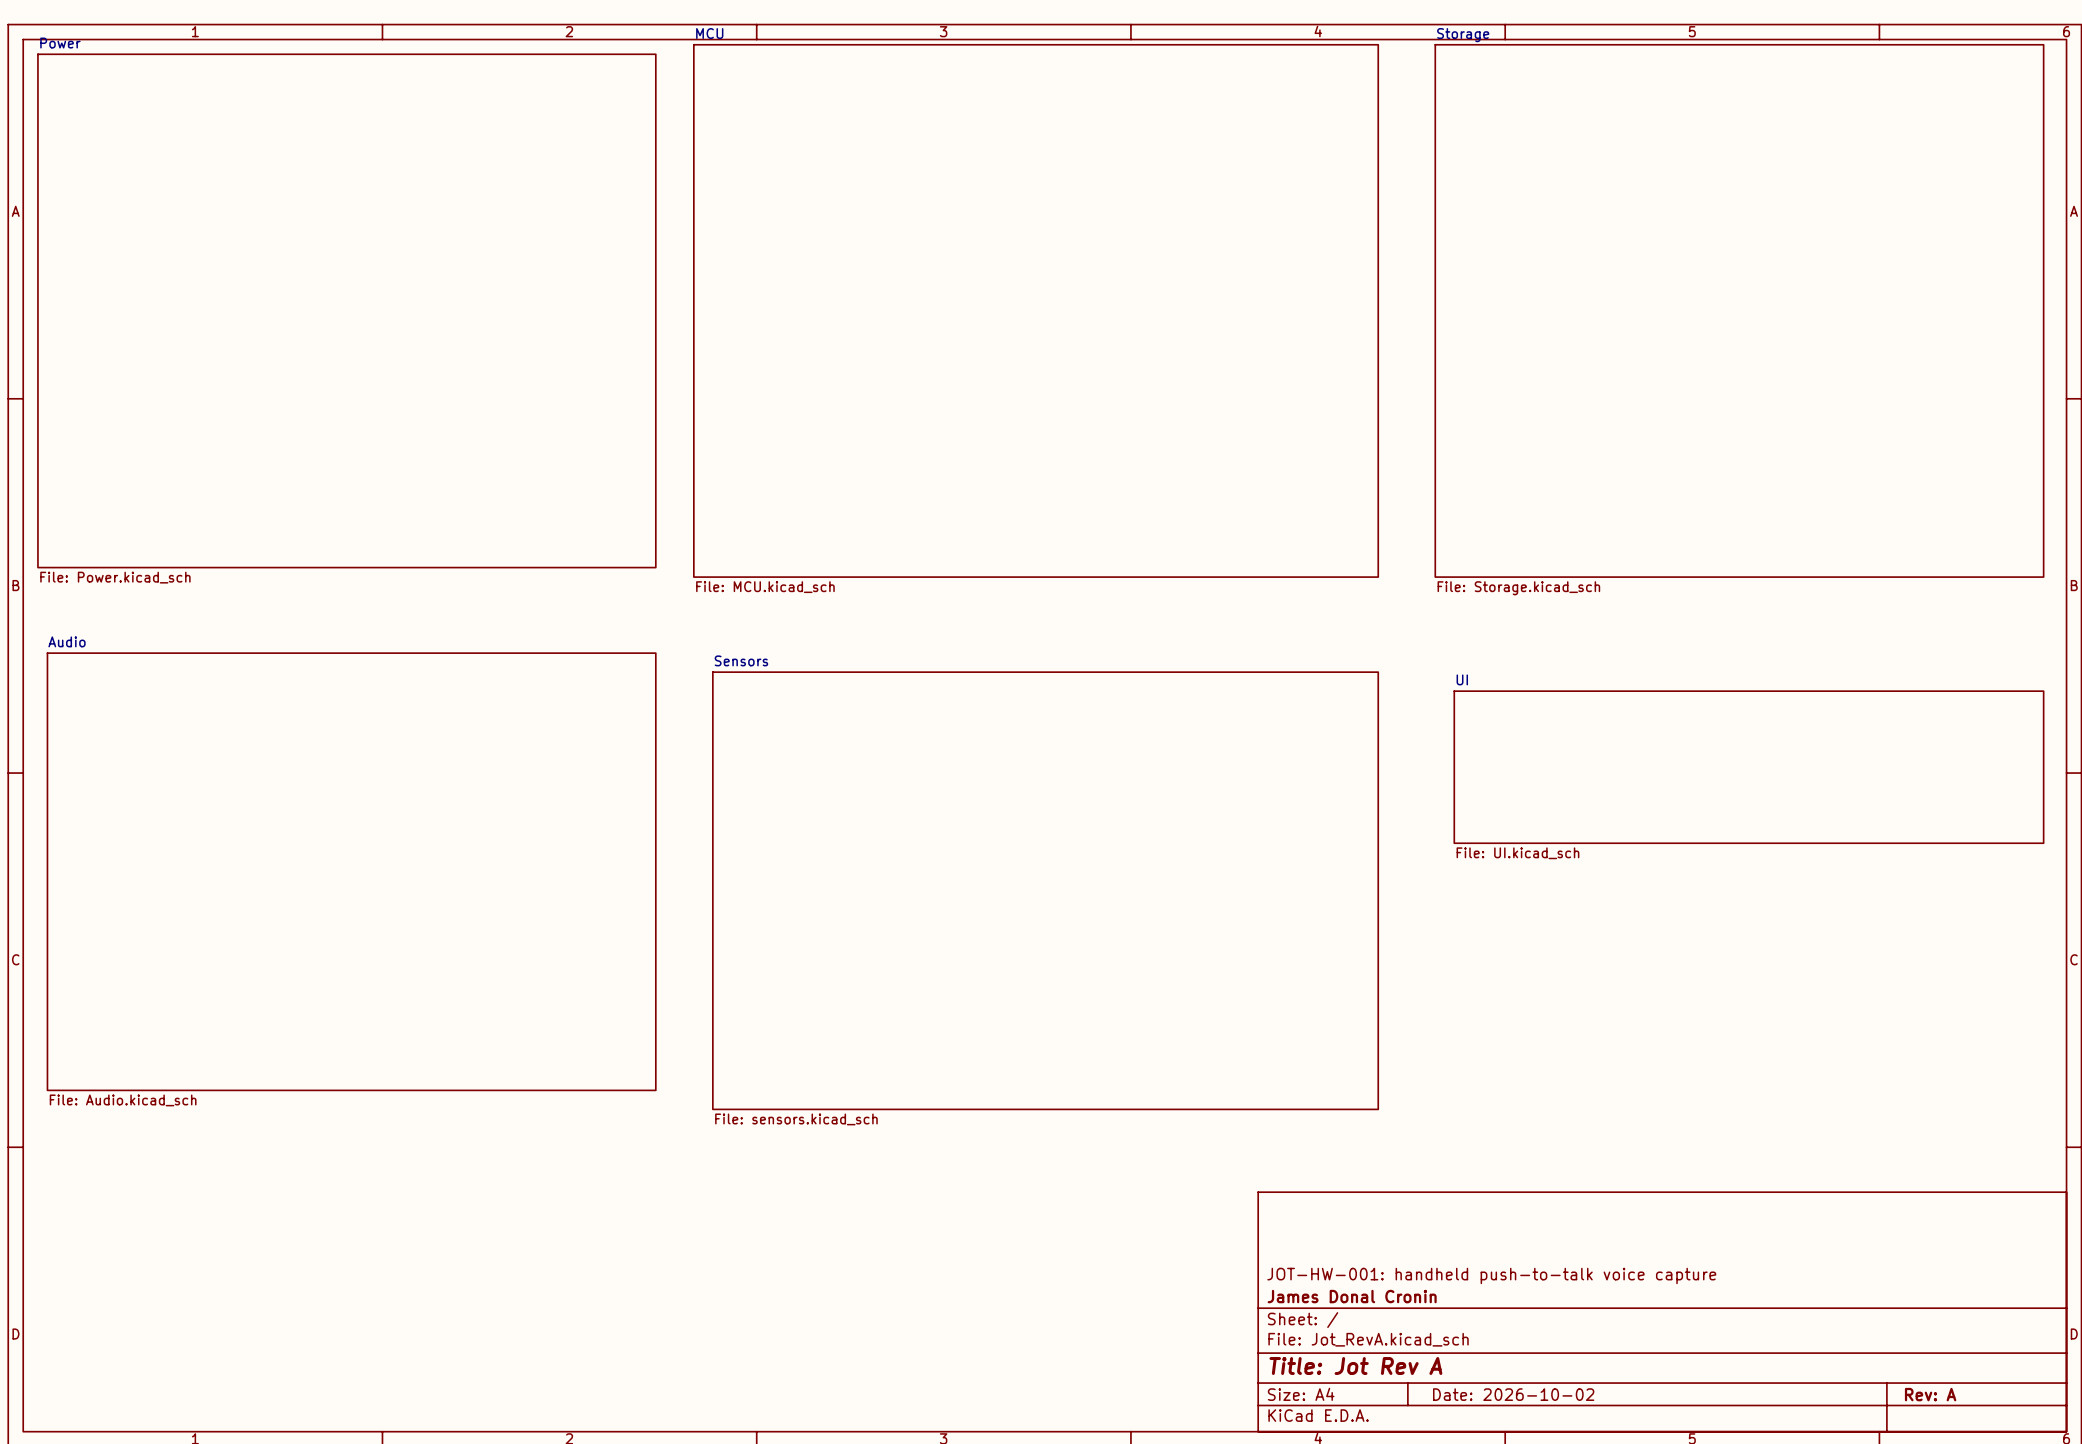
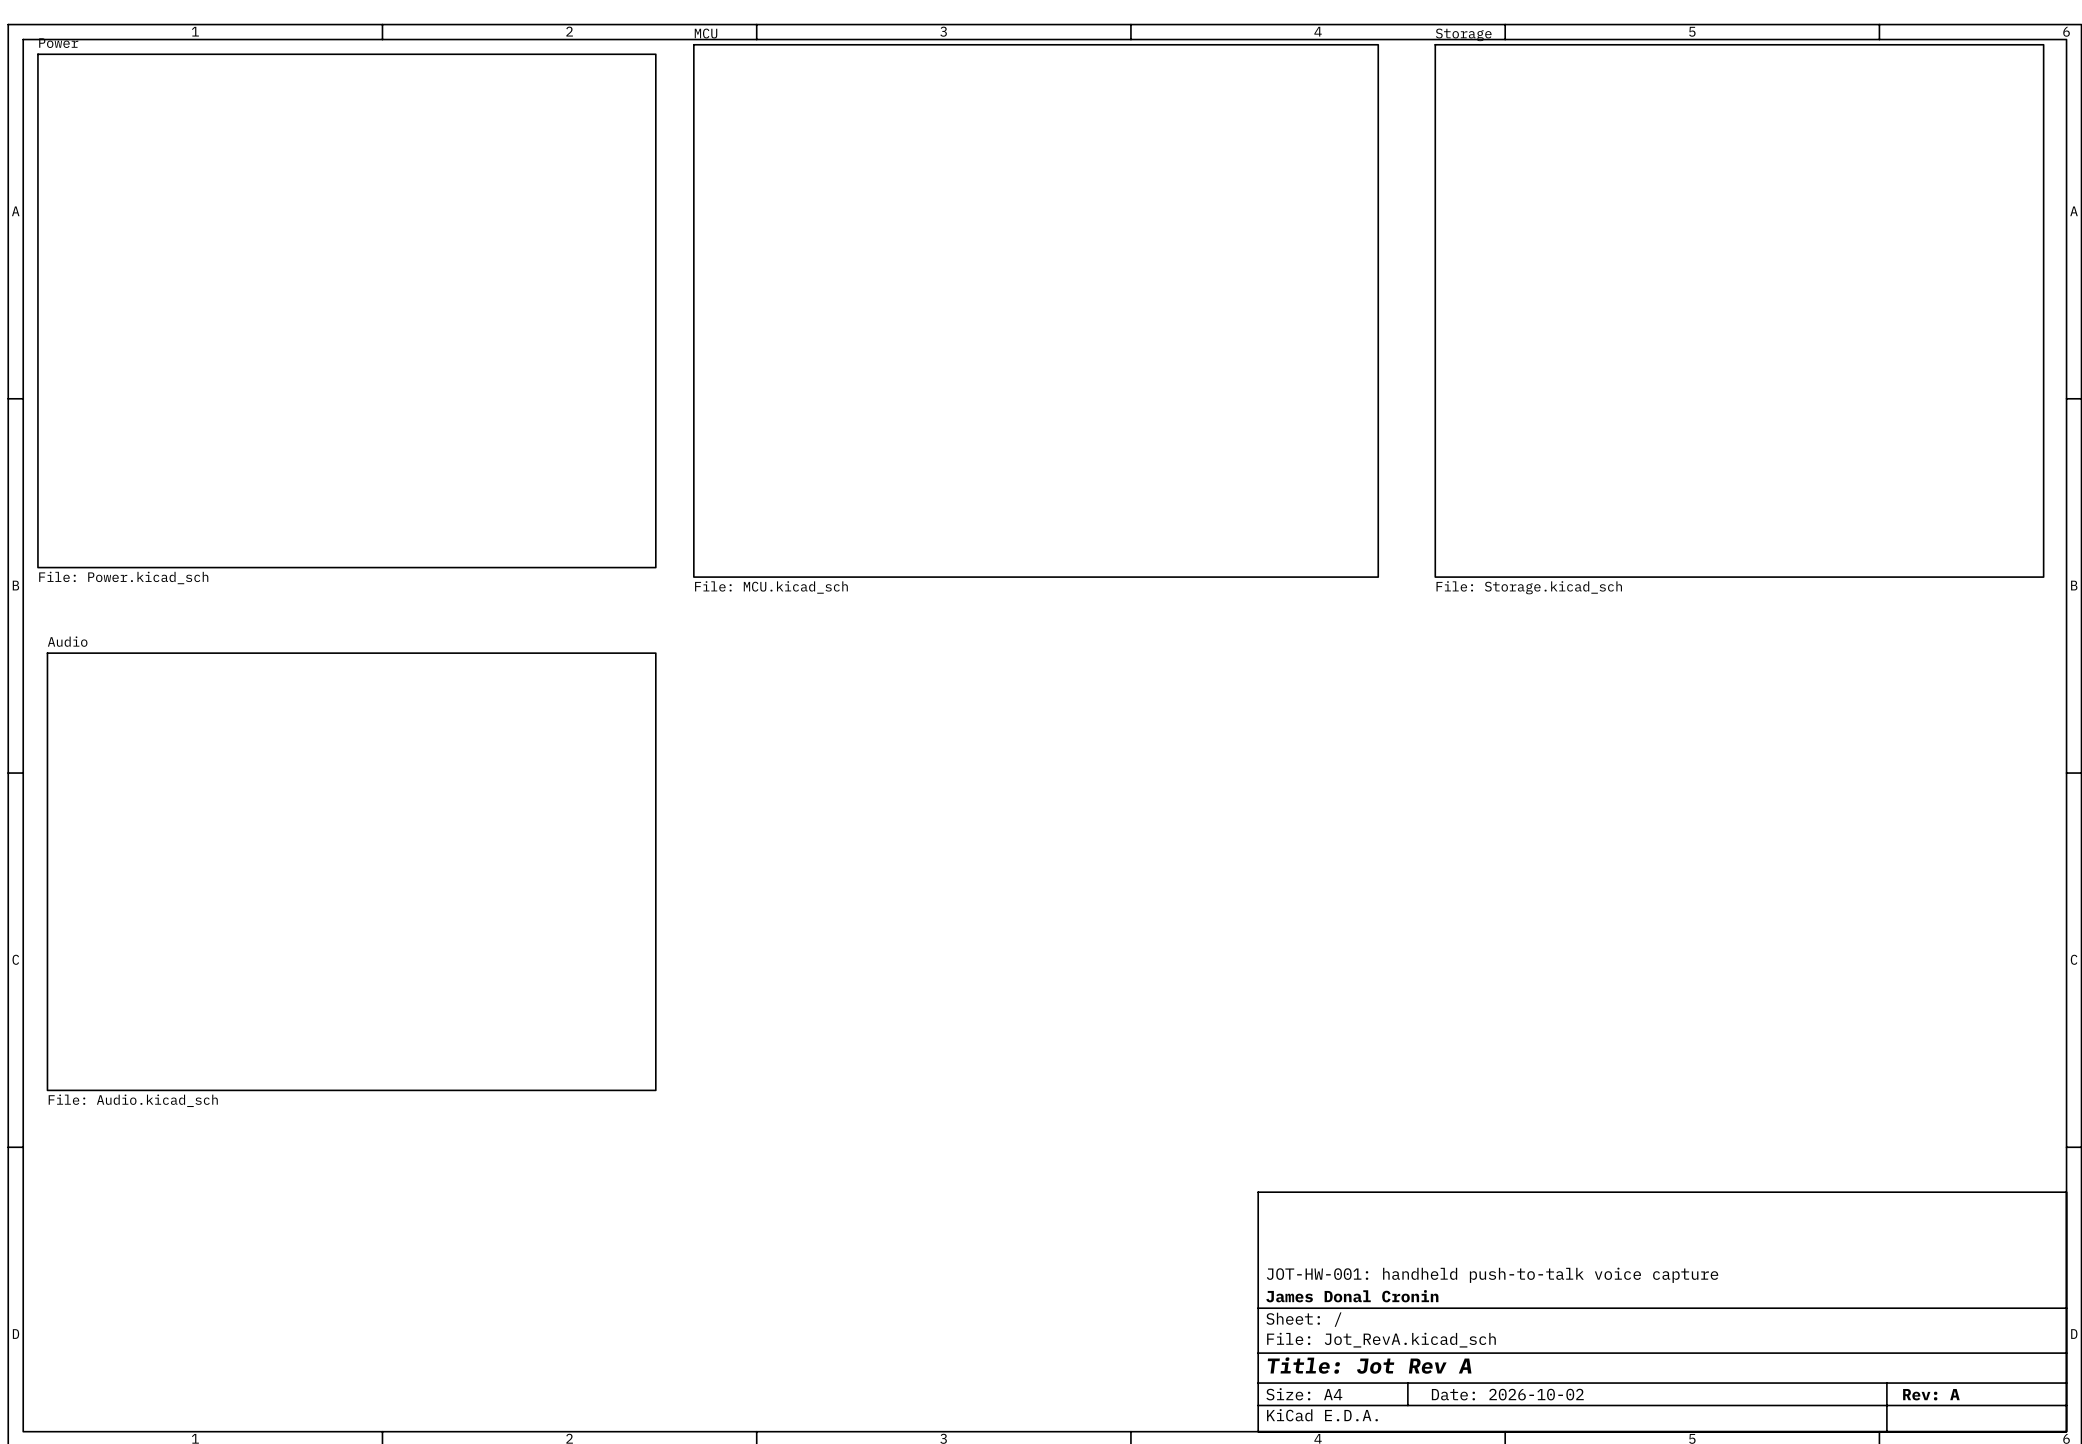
sheet UI: File: UI.kicad_sch (1748, 767) -> none
sheet Sensors: File: sensors.kicad_sch (1045, 890) -> none

